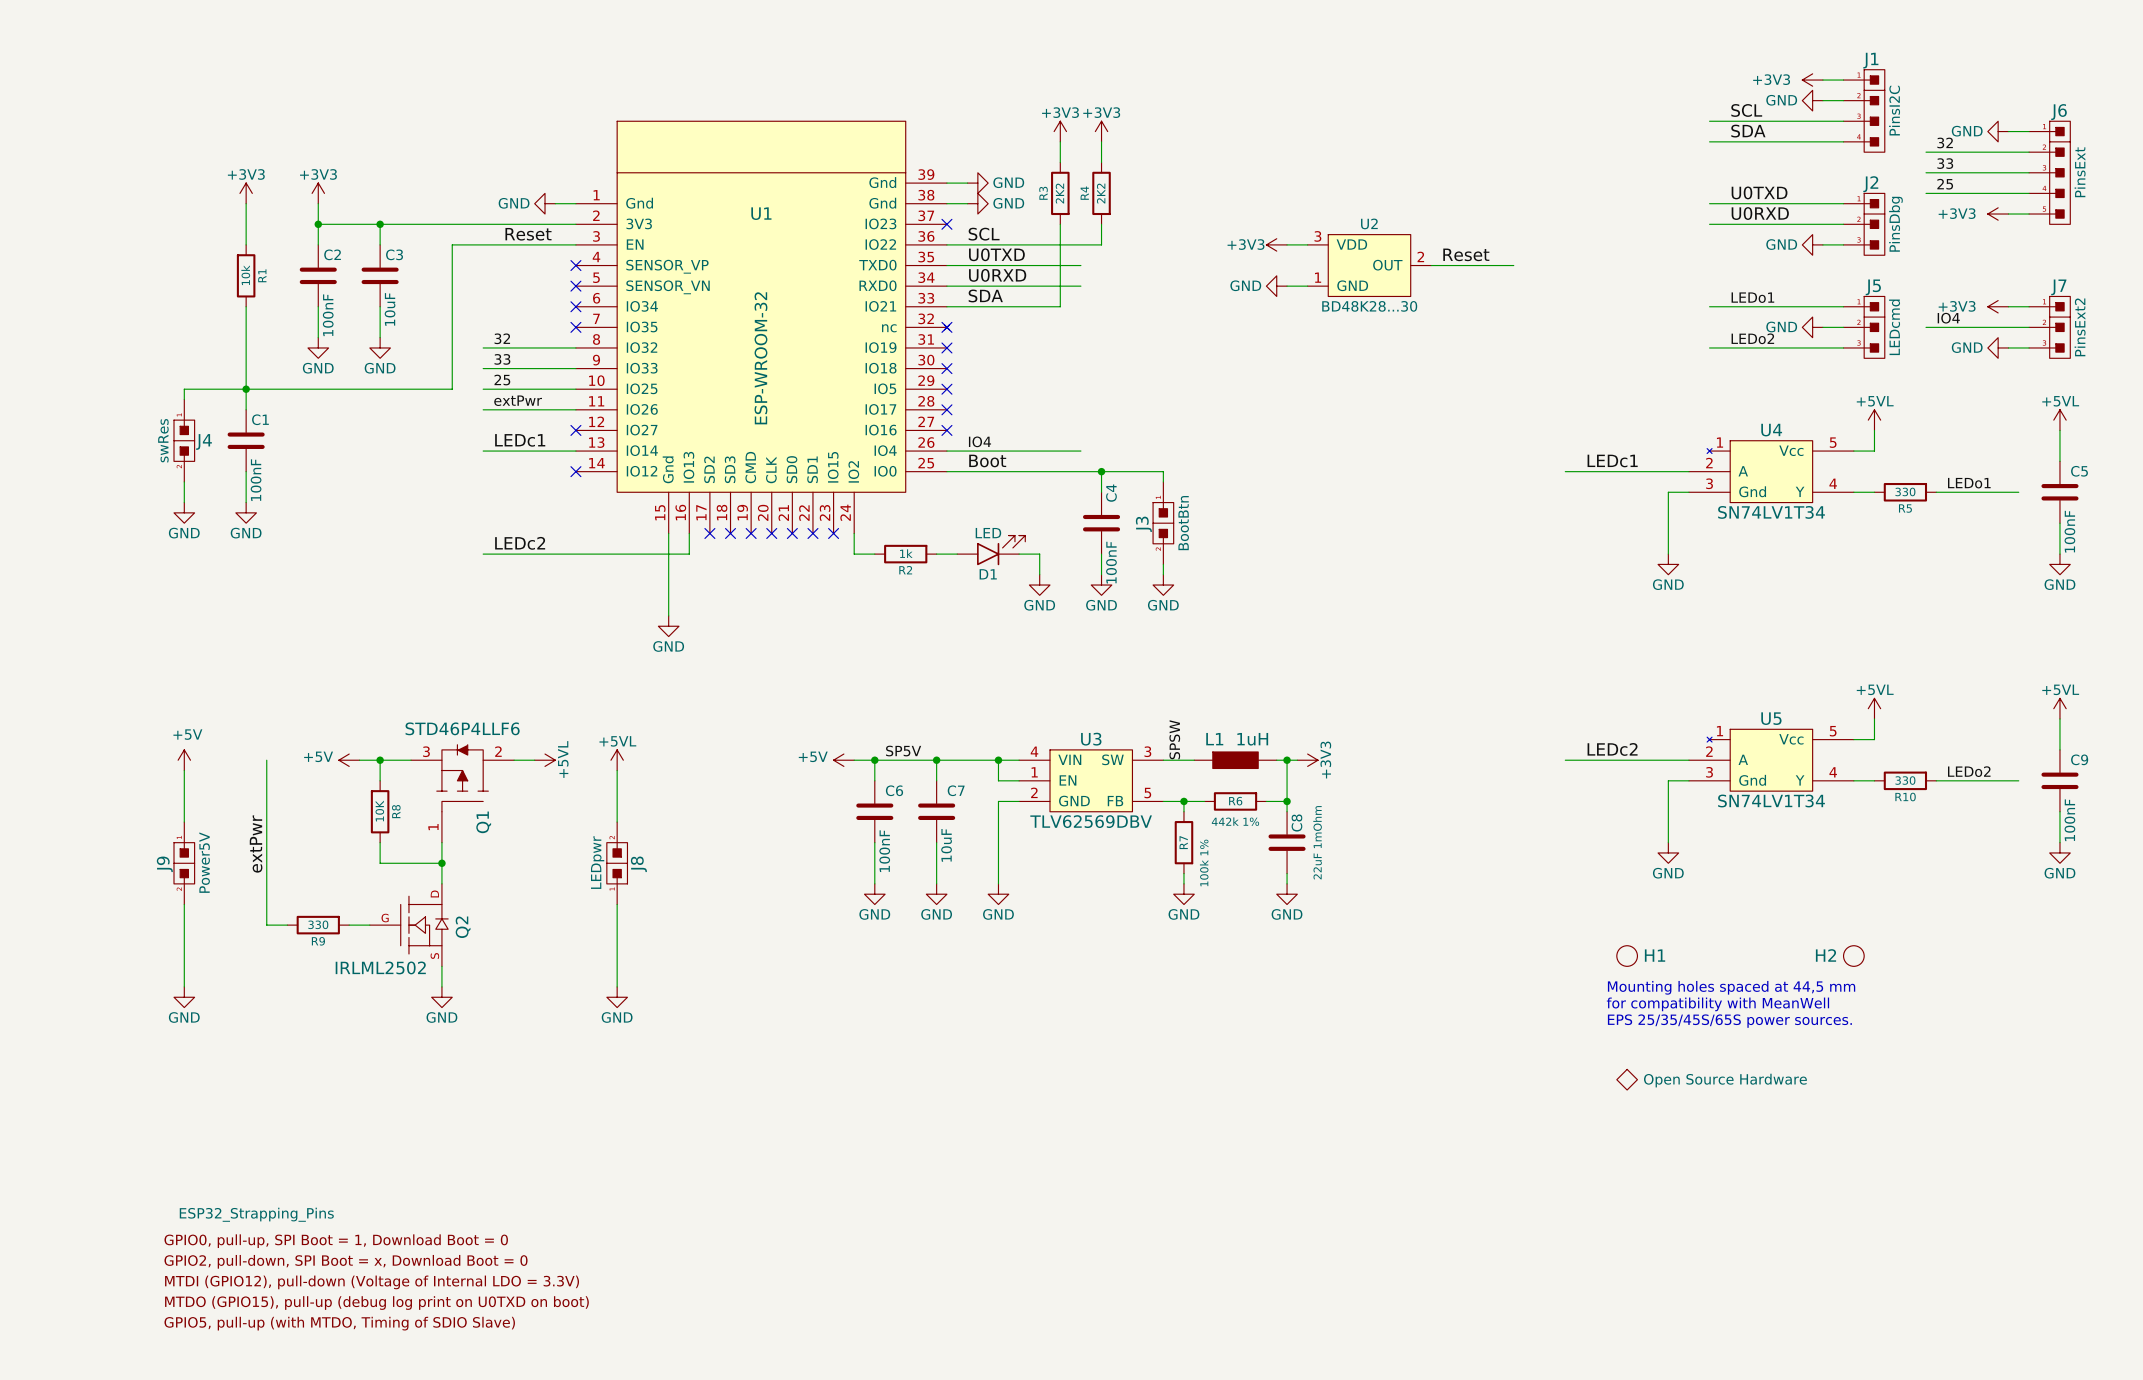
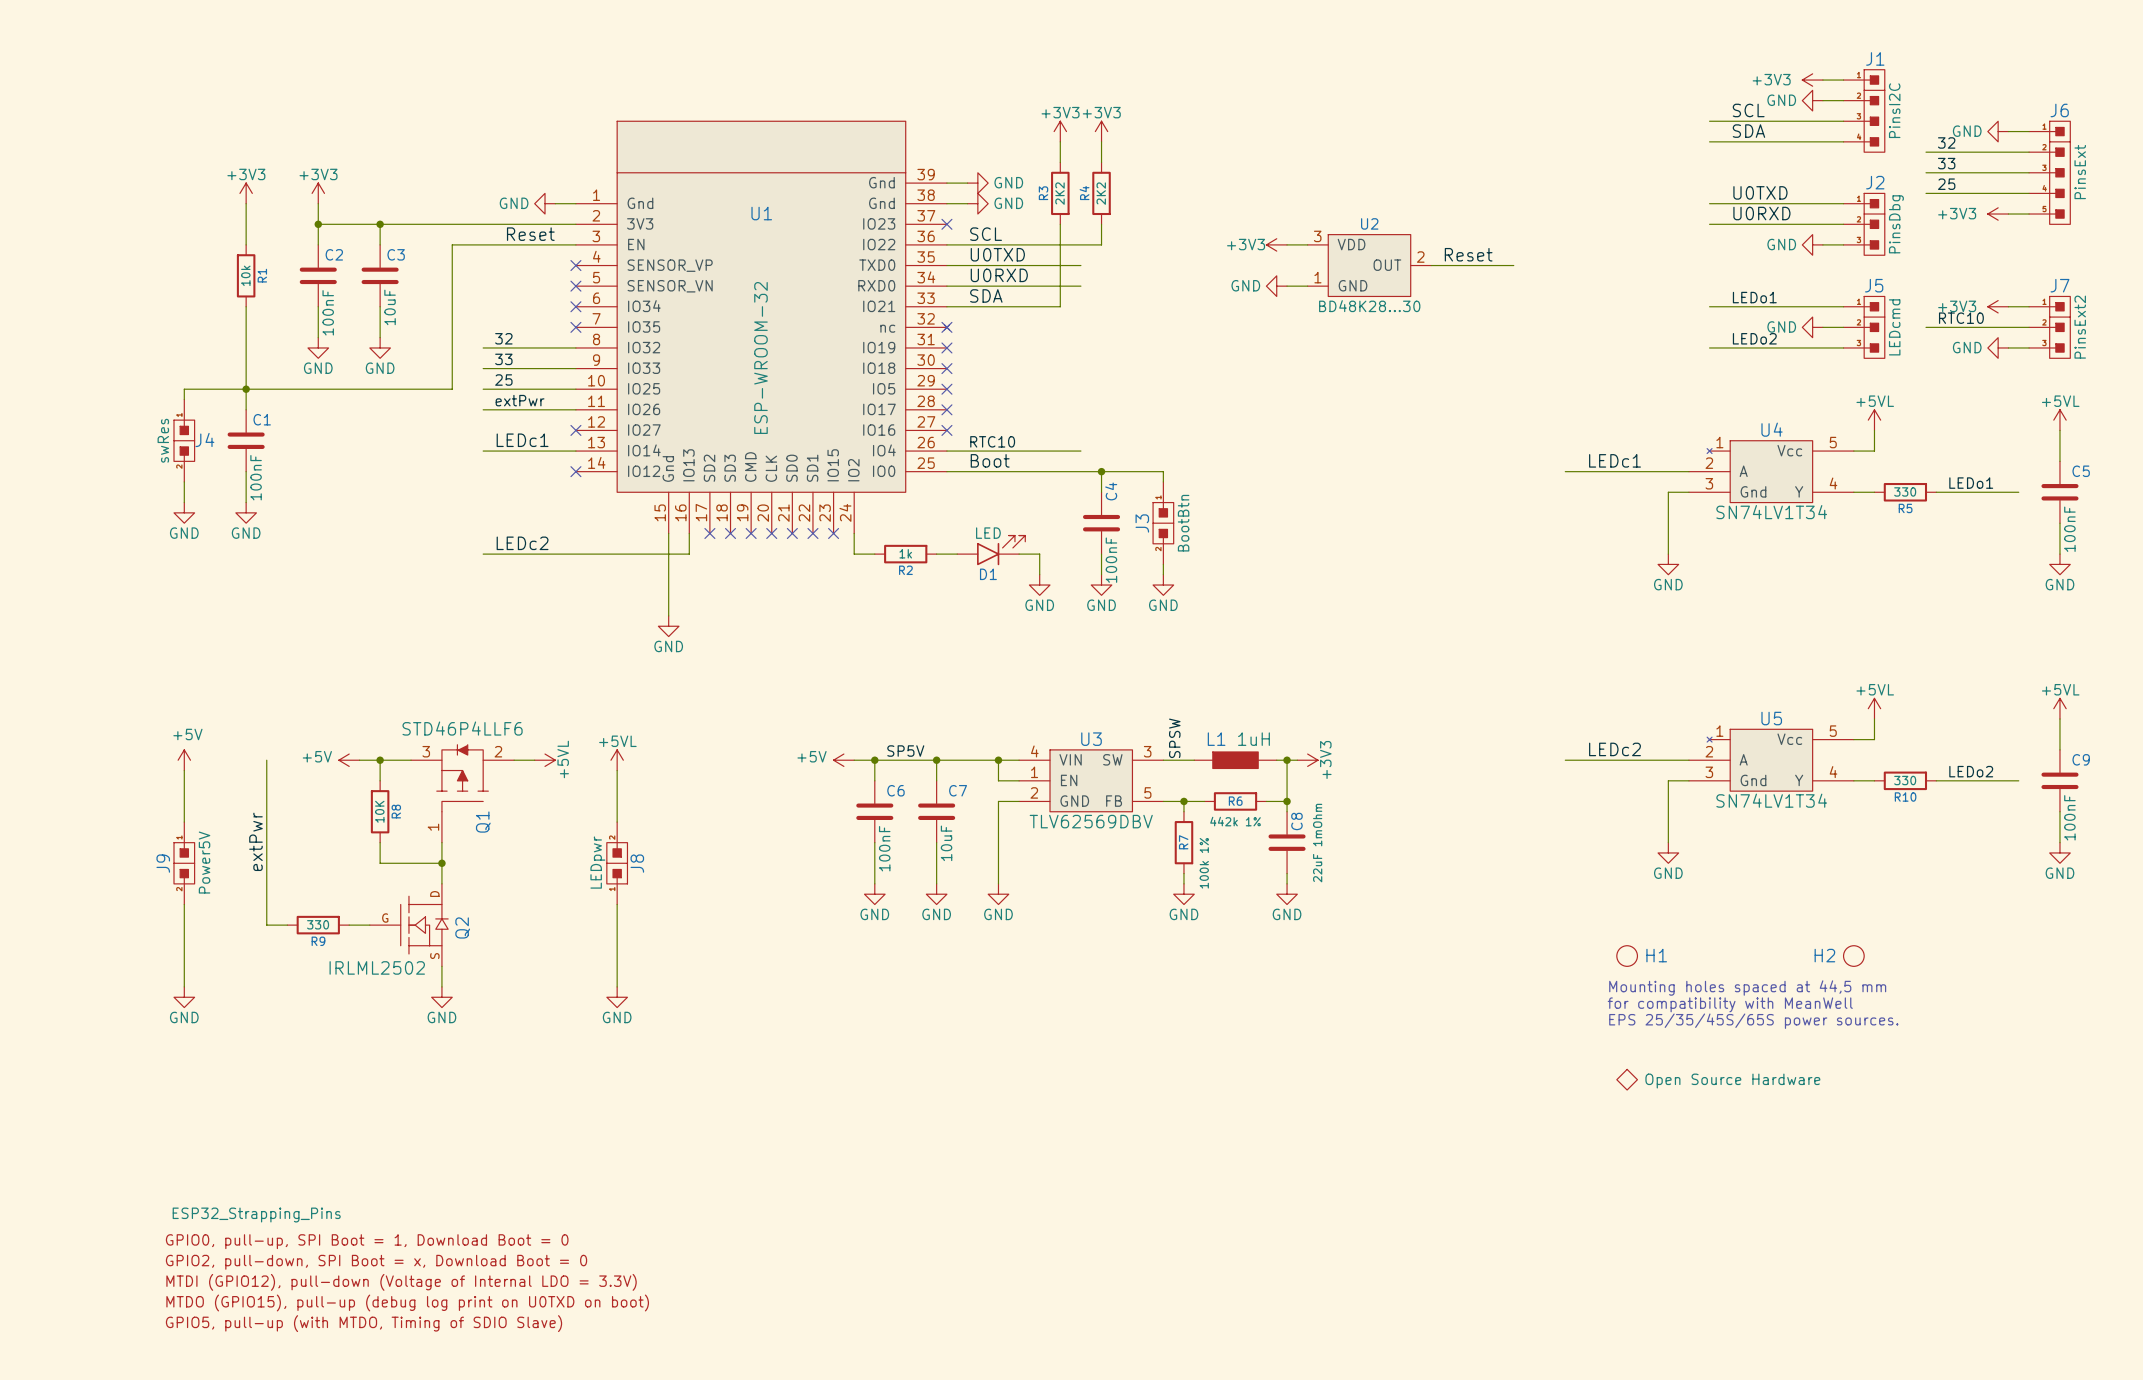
label: IO4 (1948, 318) -> RTC10 (1961, 318)
label: IO4 (979, 441) -> RTC10 (992, 441)

